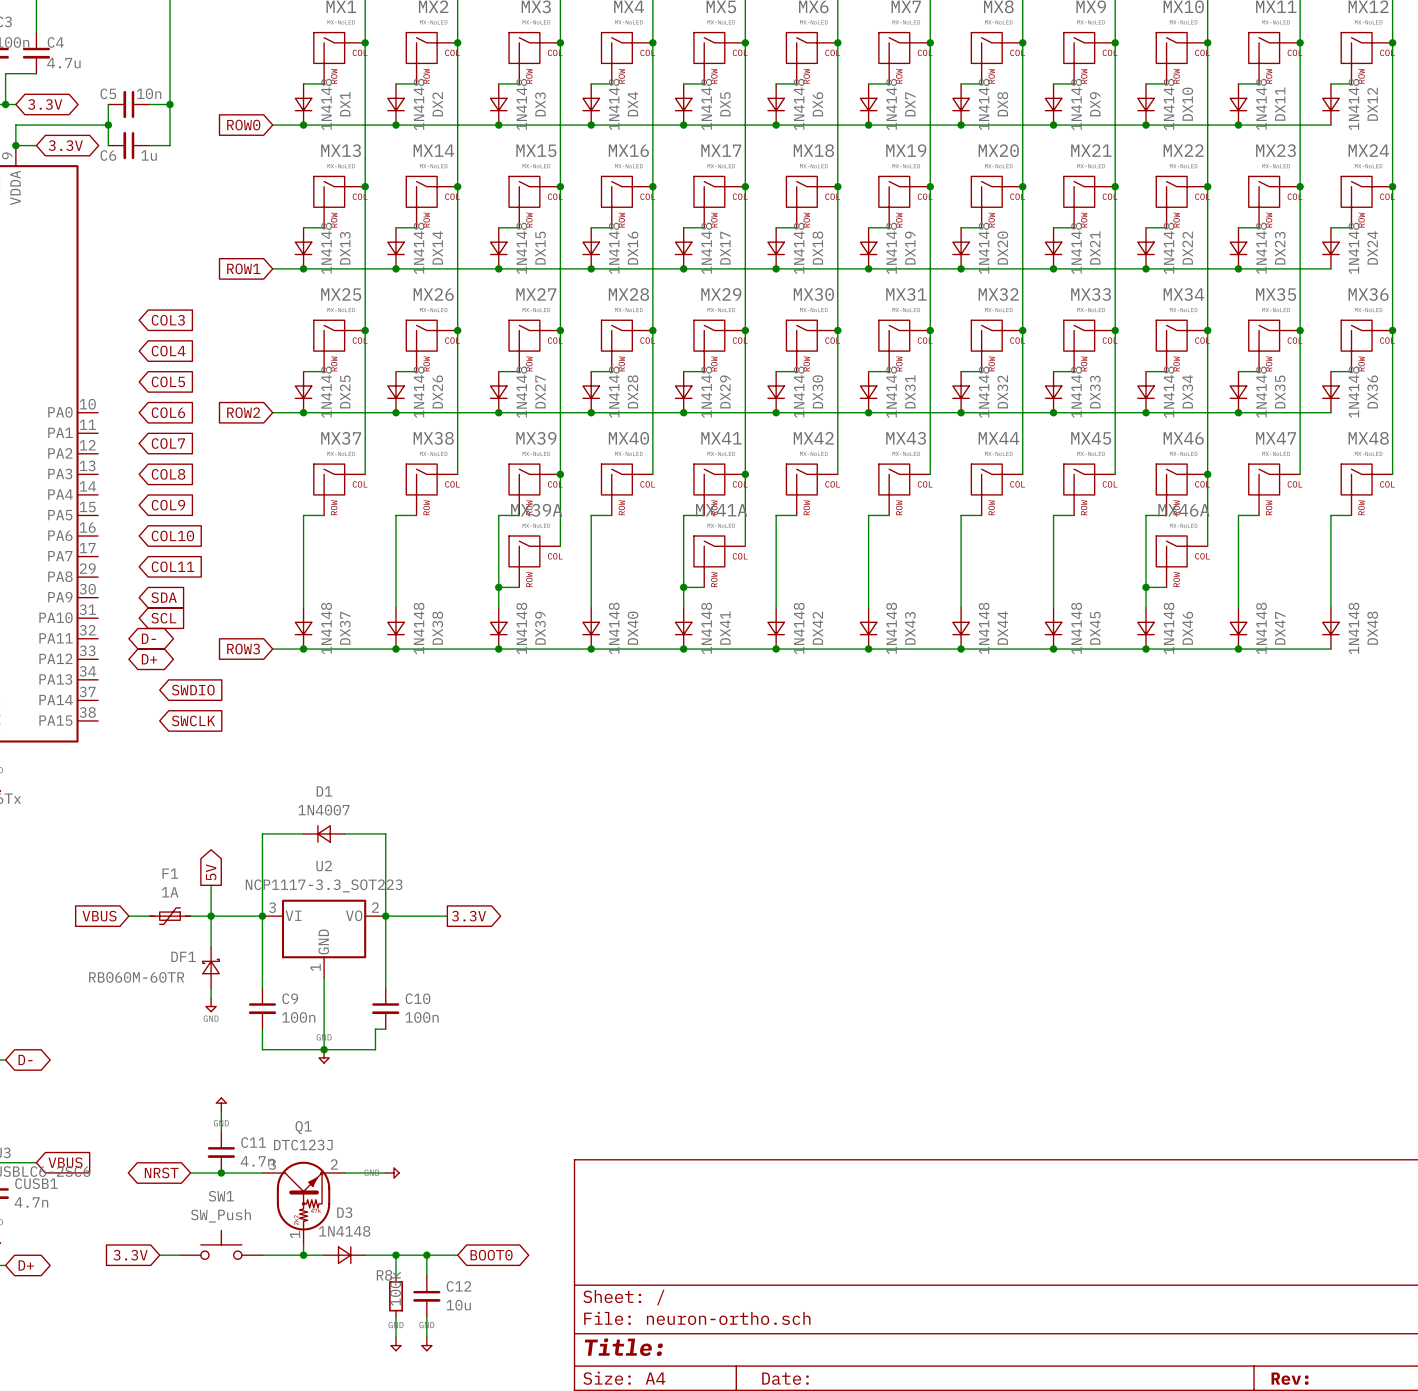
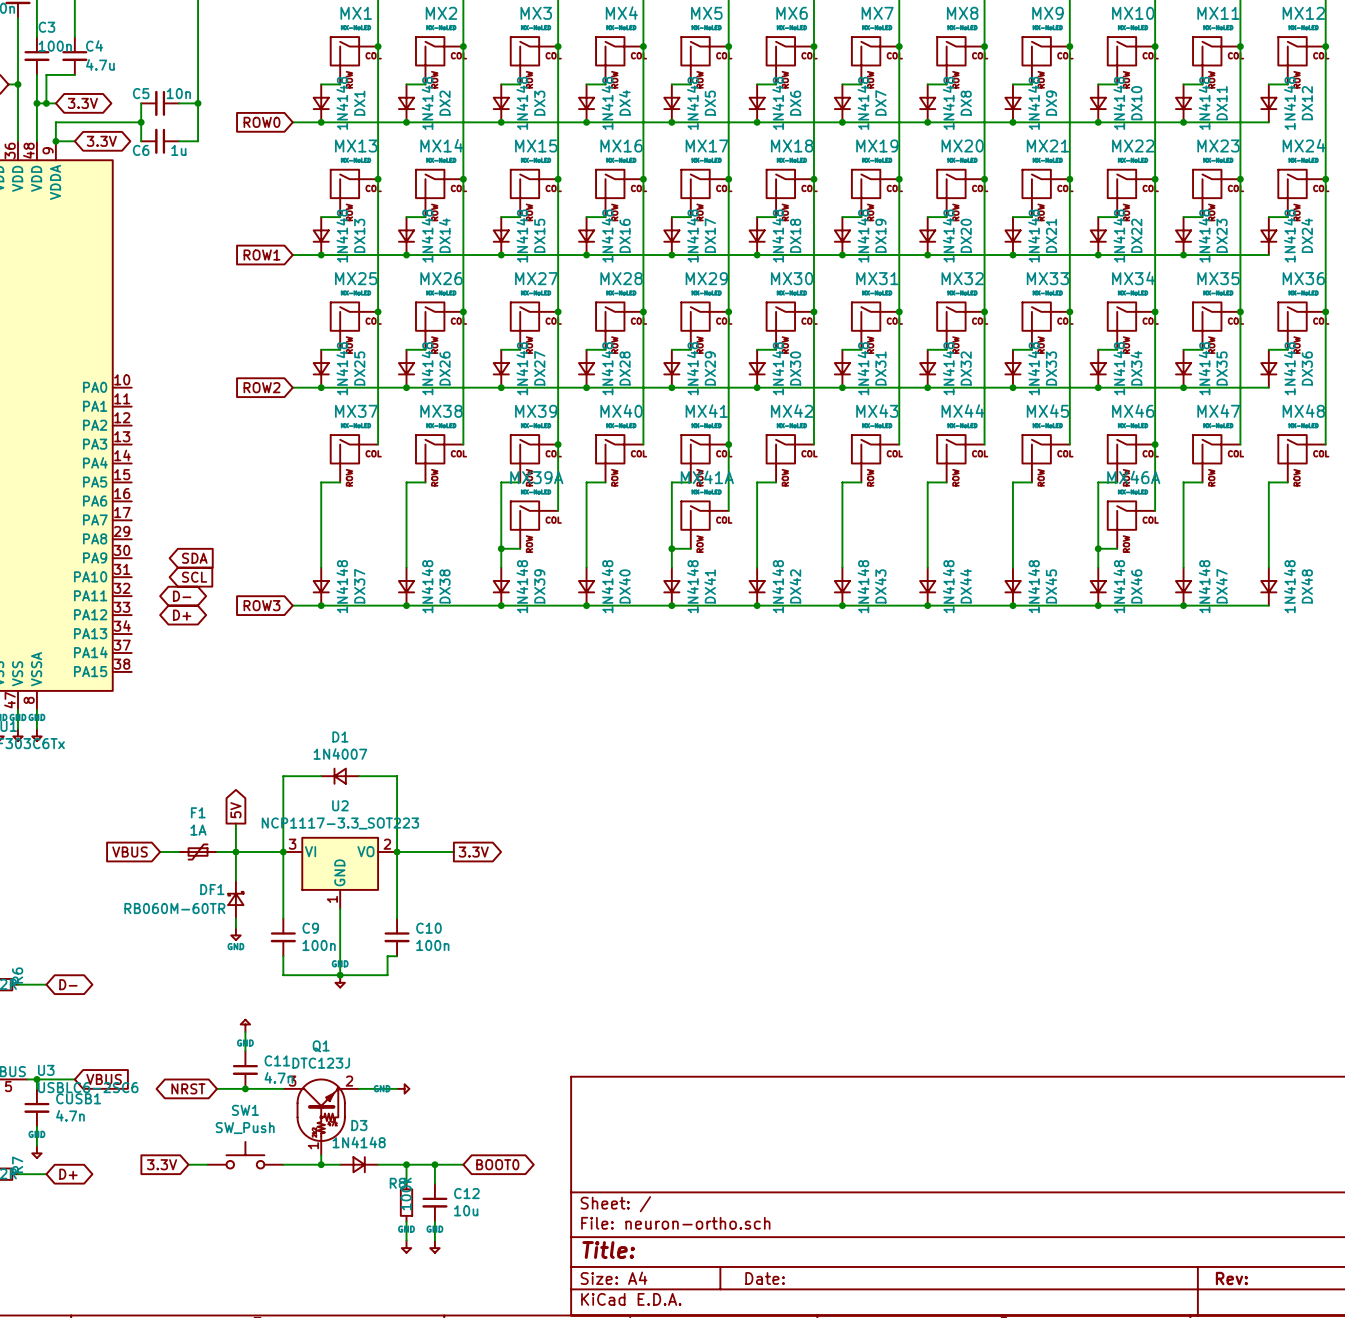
global label: COL3 (168, 320) -> none
global label: COL4 (168, 351) -> none
global label: COL5 (168, 381) -> none
global label: COL6 (168, 412) -> none
global label: COL7 (168, 443) -> none
global label: COL8 (168, 474) -> none
global label: COL9 (168, 505) -> none
global label: COL10 (172, 536) -> none
global label: COL11 (172, 566) -> none
global label: SWDIO (193, 690) -> none
global label: SWCLK (193, 720) -> none

